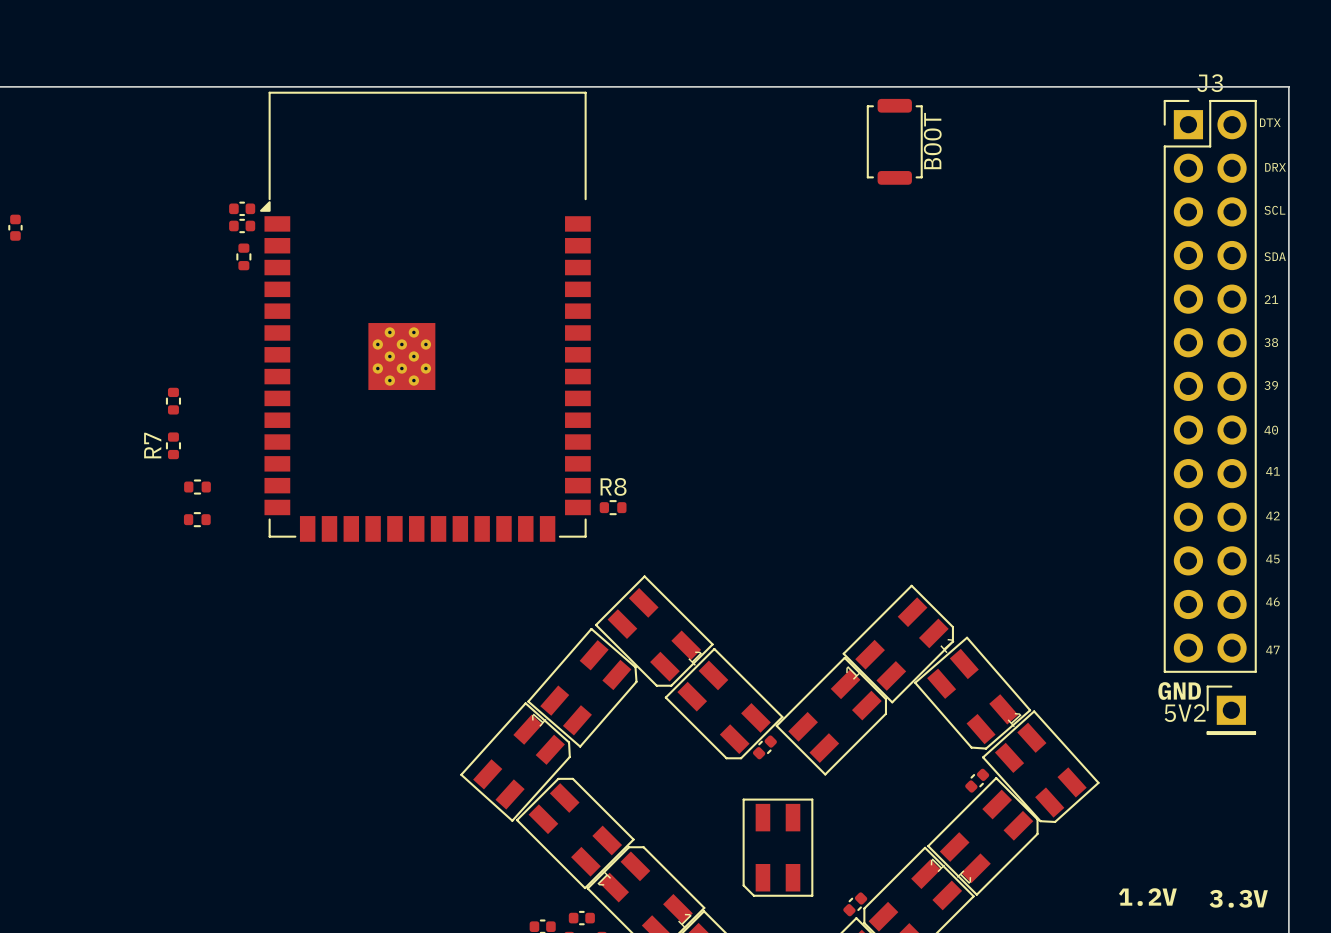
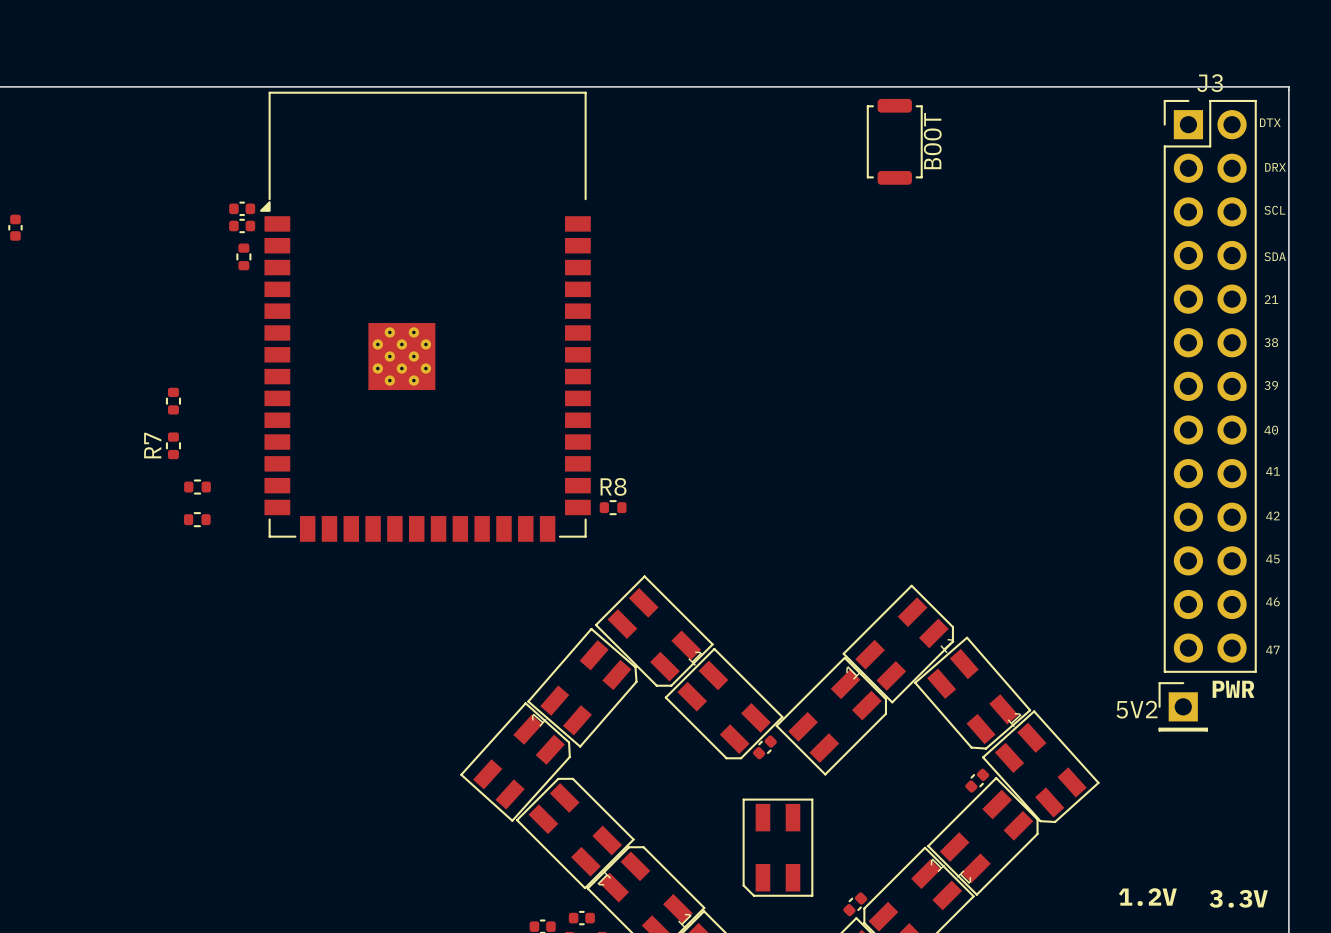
text: none -> PWR (1233, 689)
text: GND (1179, 691) -> none
5V2 position: (1231, 710) -> (1183, 706)

